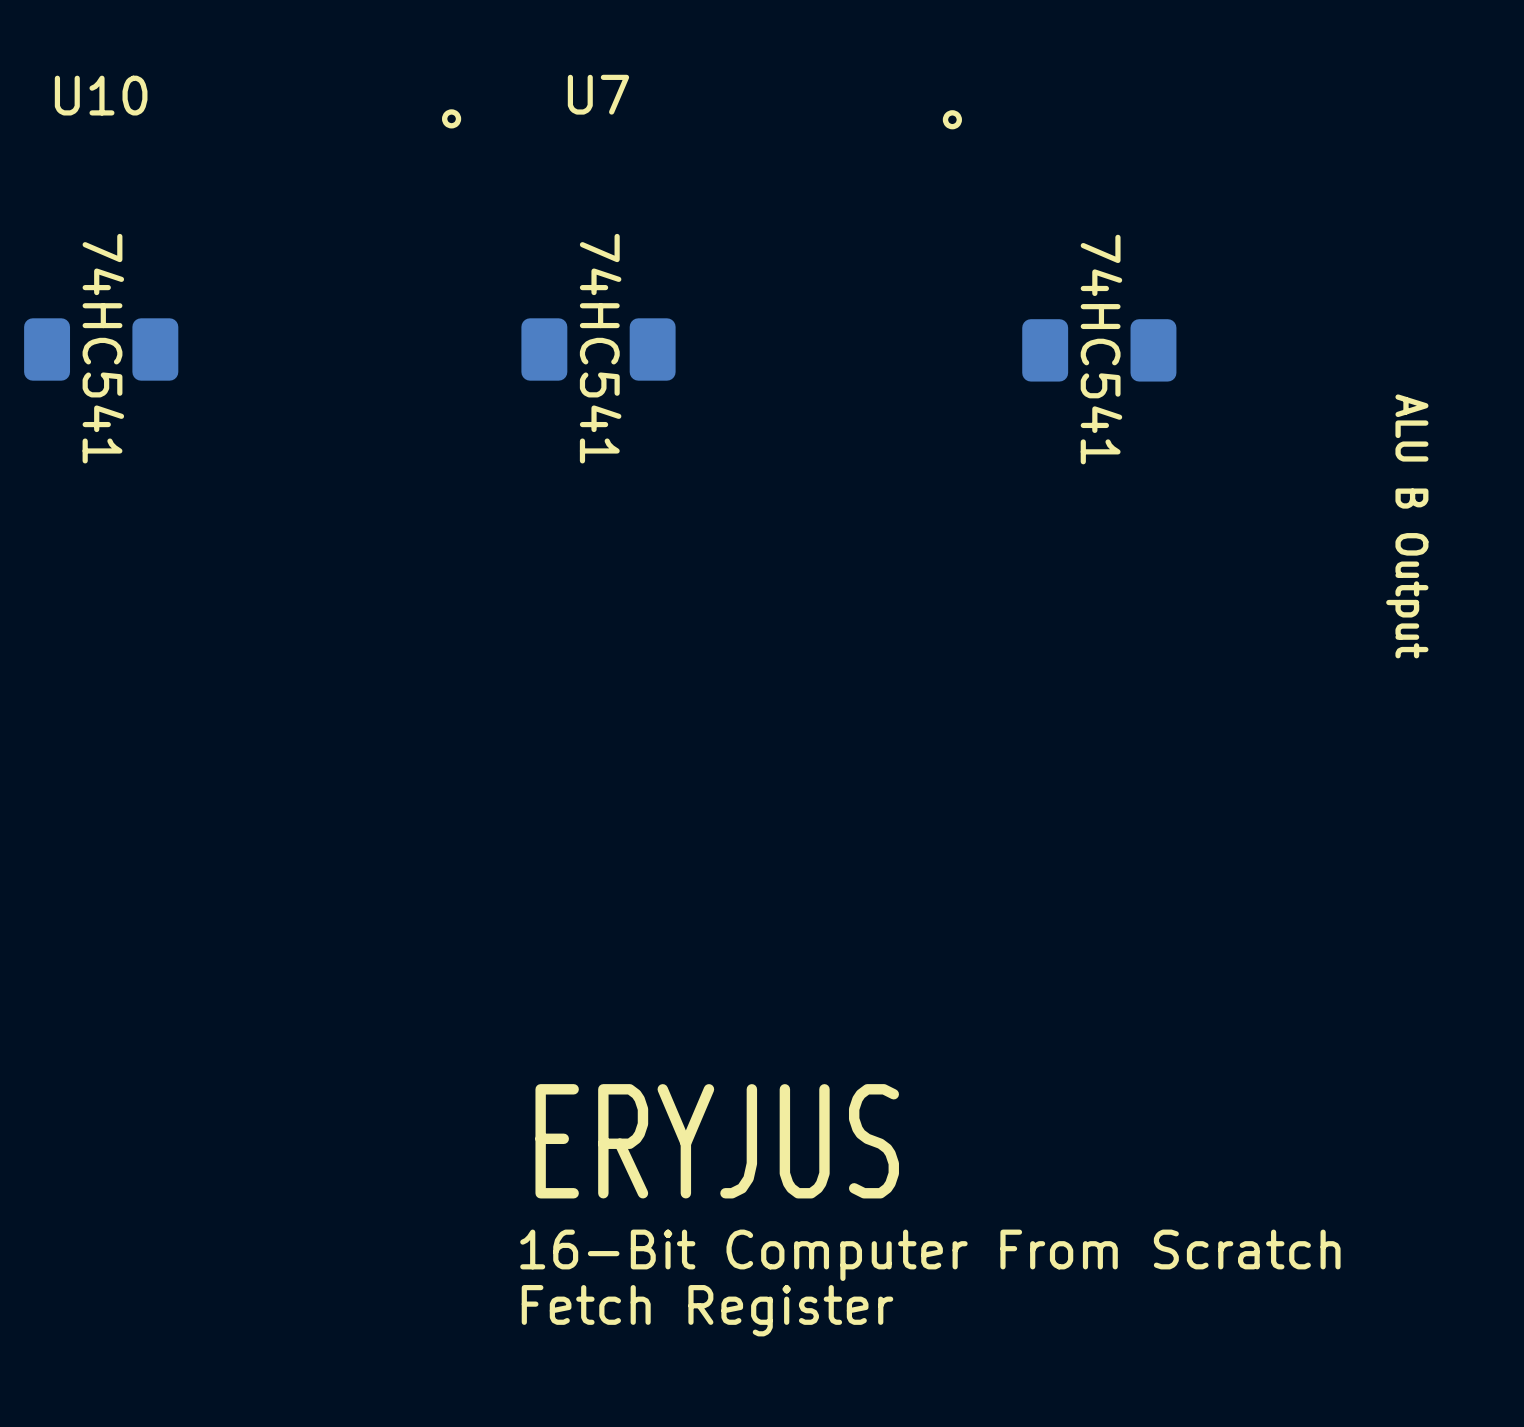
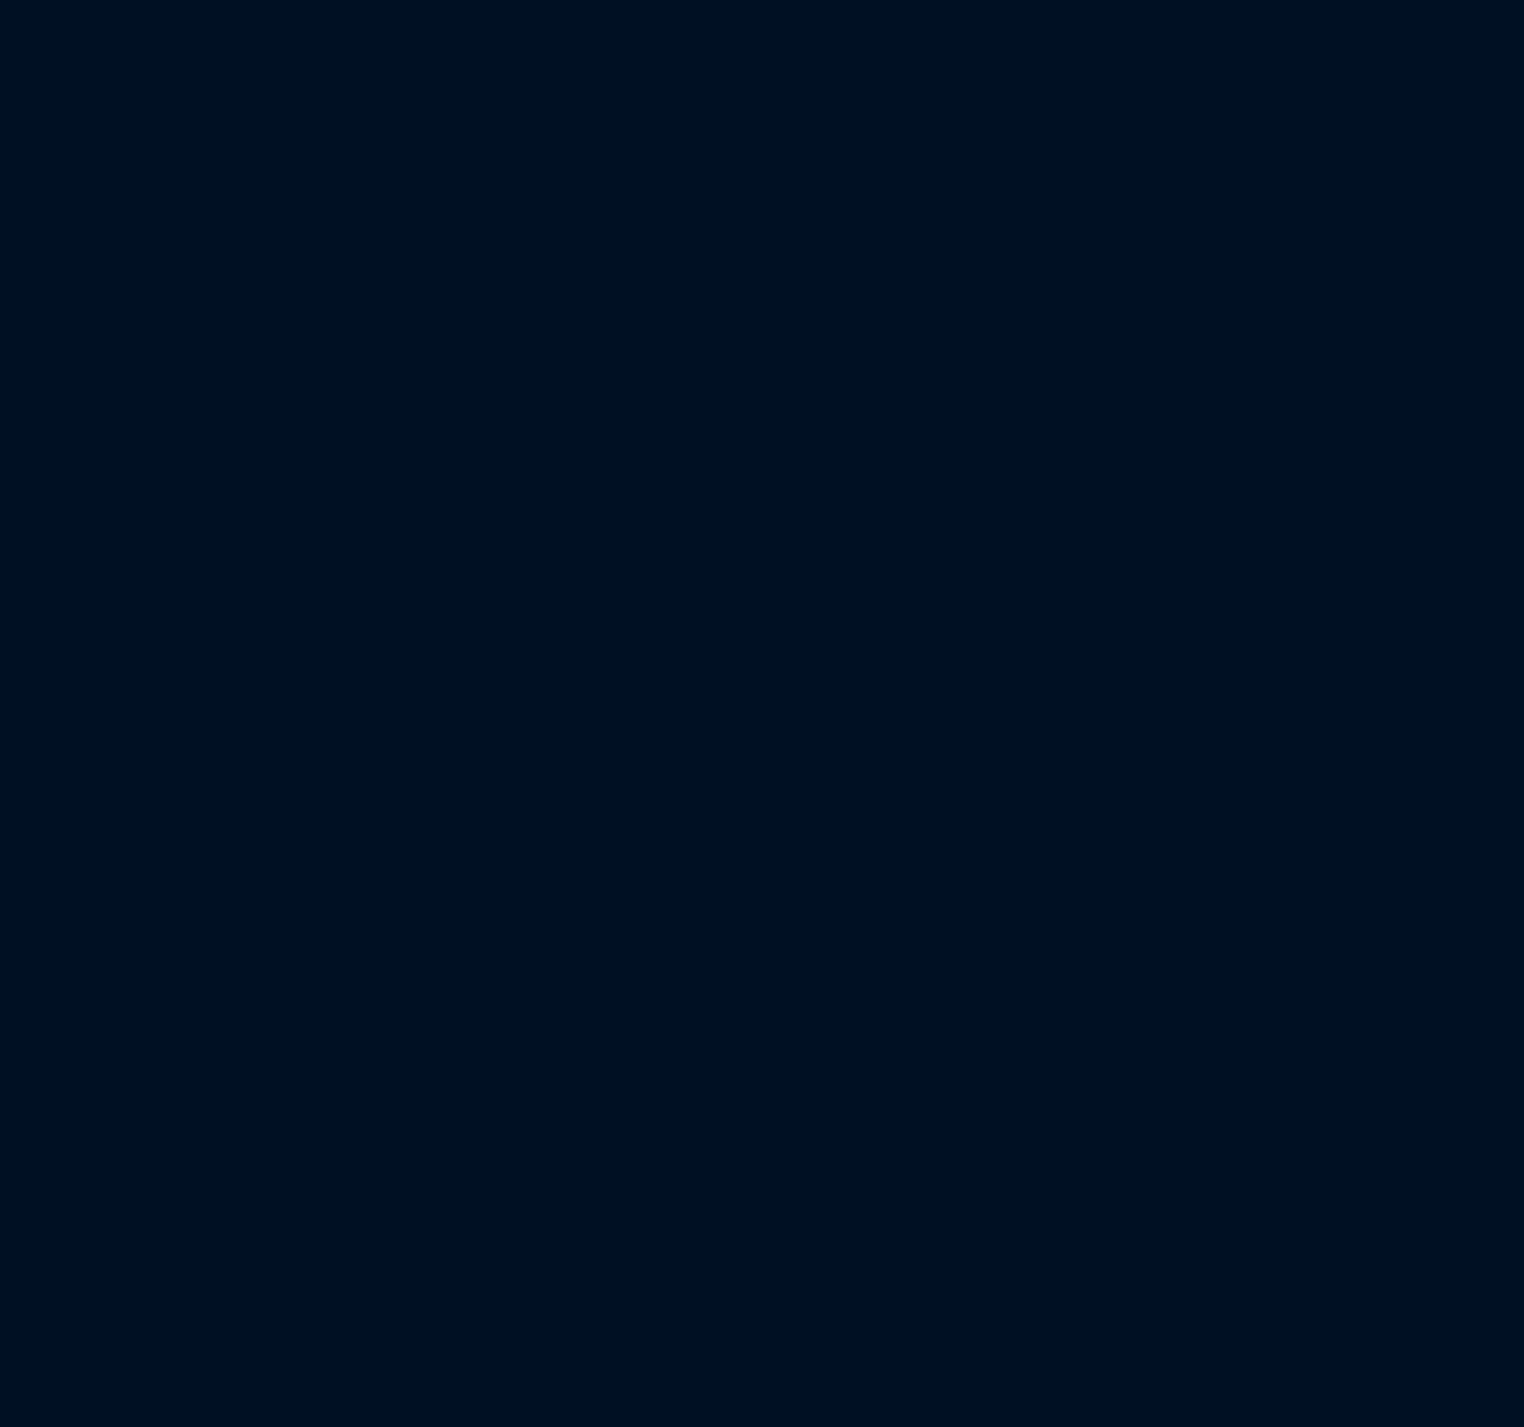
text: U7 (598, 94) -> none
text: U10 (101, 95) -> none
drawing: [441, 109, 462, 129] -> none
drawing: [942, 110, 962, 130] -> none
text: 74HC541 (103, 348) -> none
text: 74HC541 (600, 348) -> none
part: (101, 349) -> none
part: (598, 349) -> none
text: 74HC541 (1101, 349) -> none
part: (1099, 350) -> none
text: ALU B Output (1407, 526) -> none
text: ERYJUS (717, 1141) -> none
text: 16-Bit Computer From Scratch (930, 1255) -> none
text: Fetch Register (707, 1310) -> none

